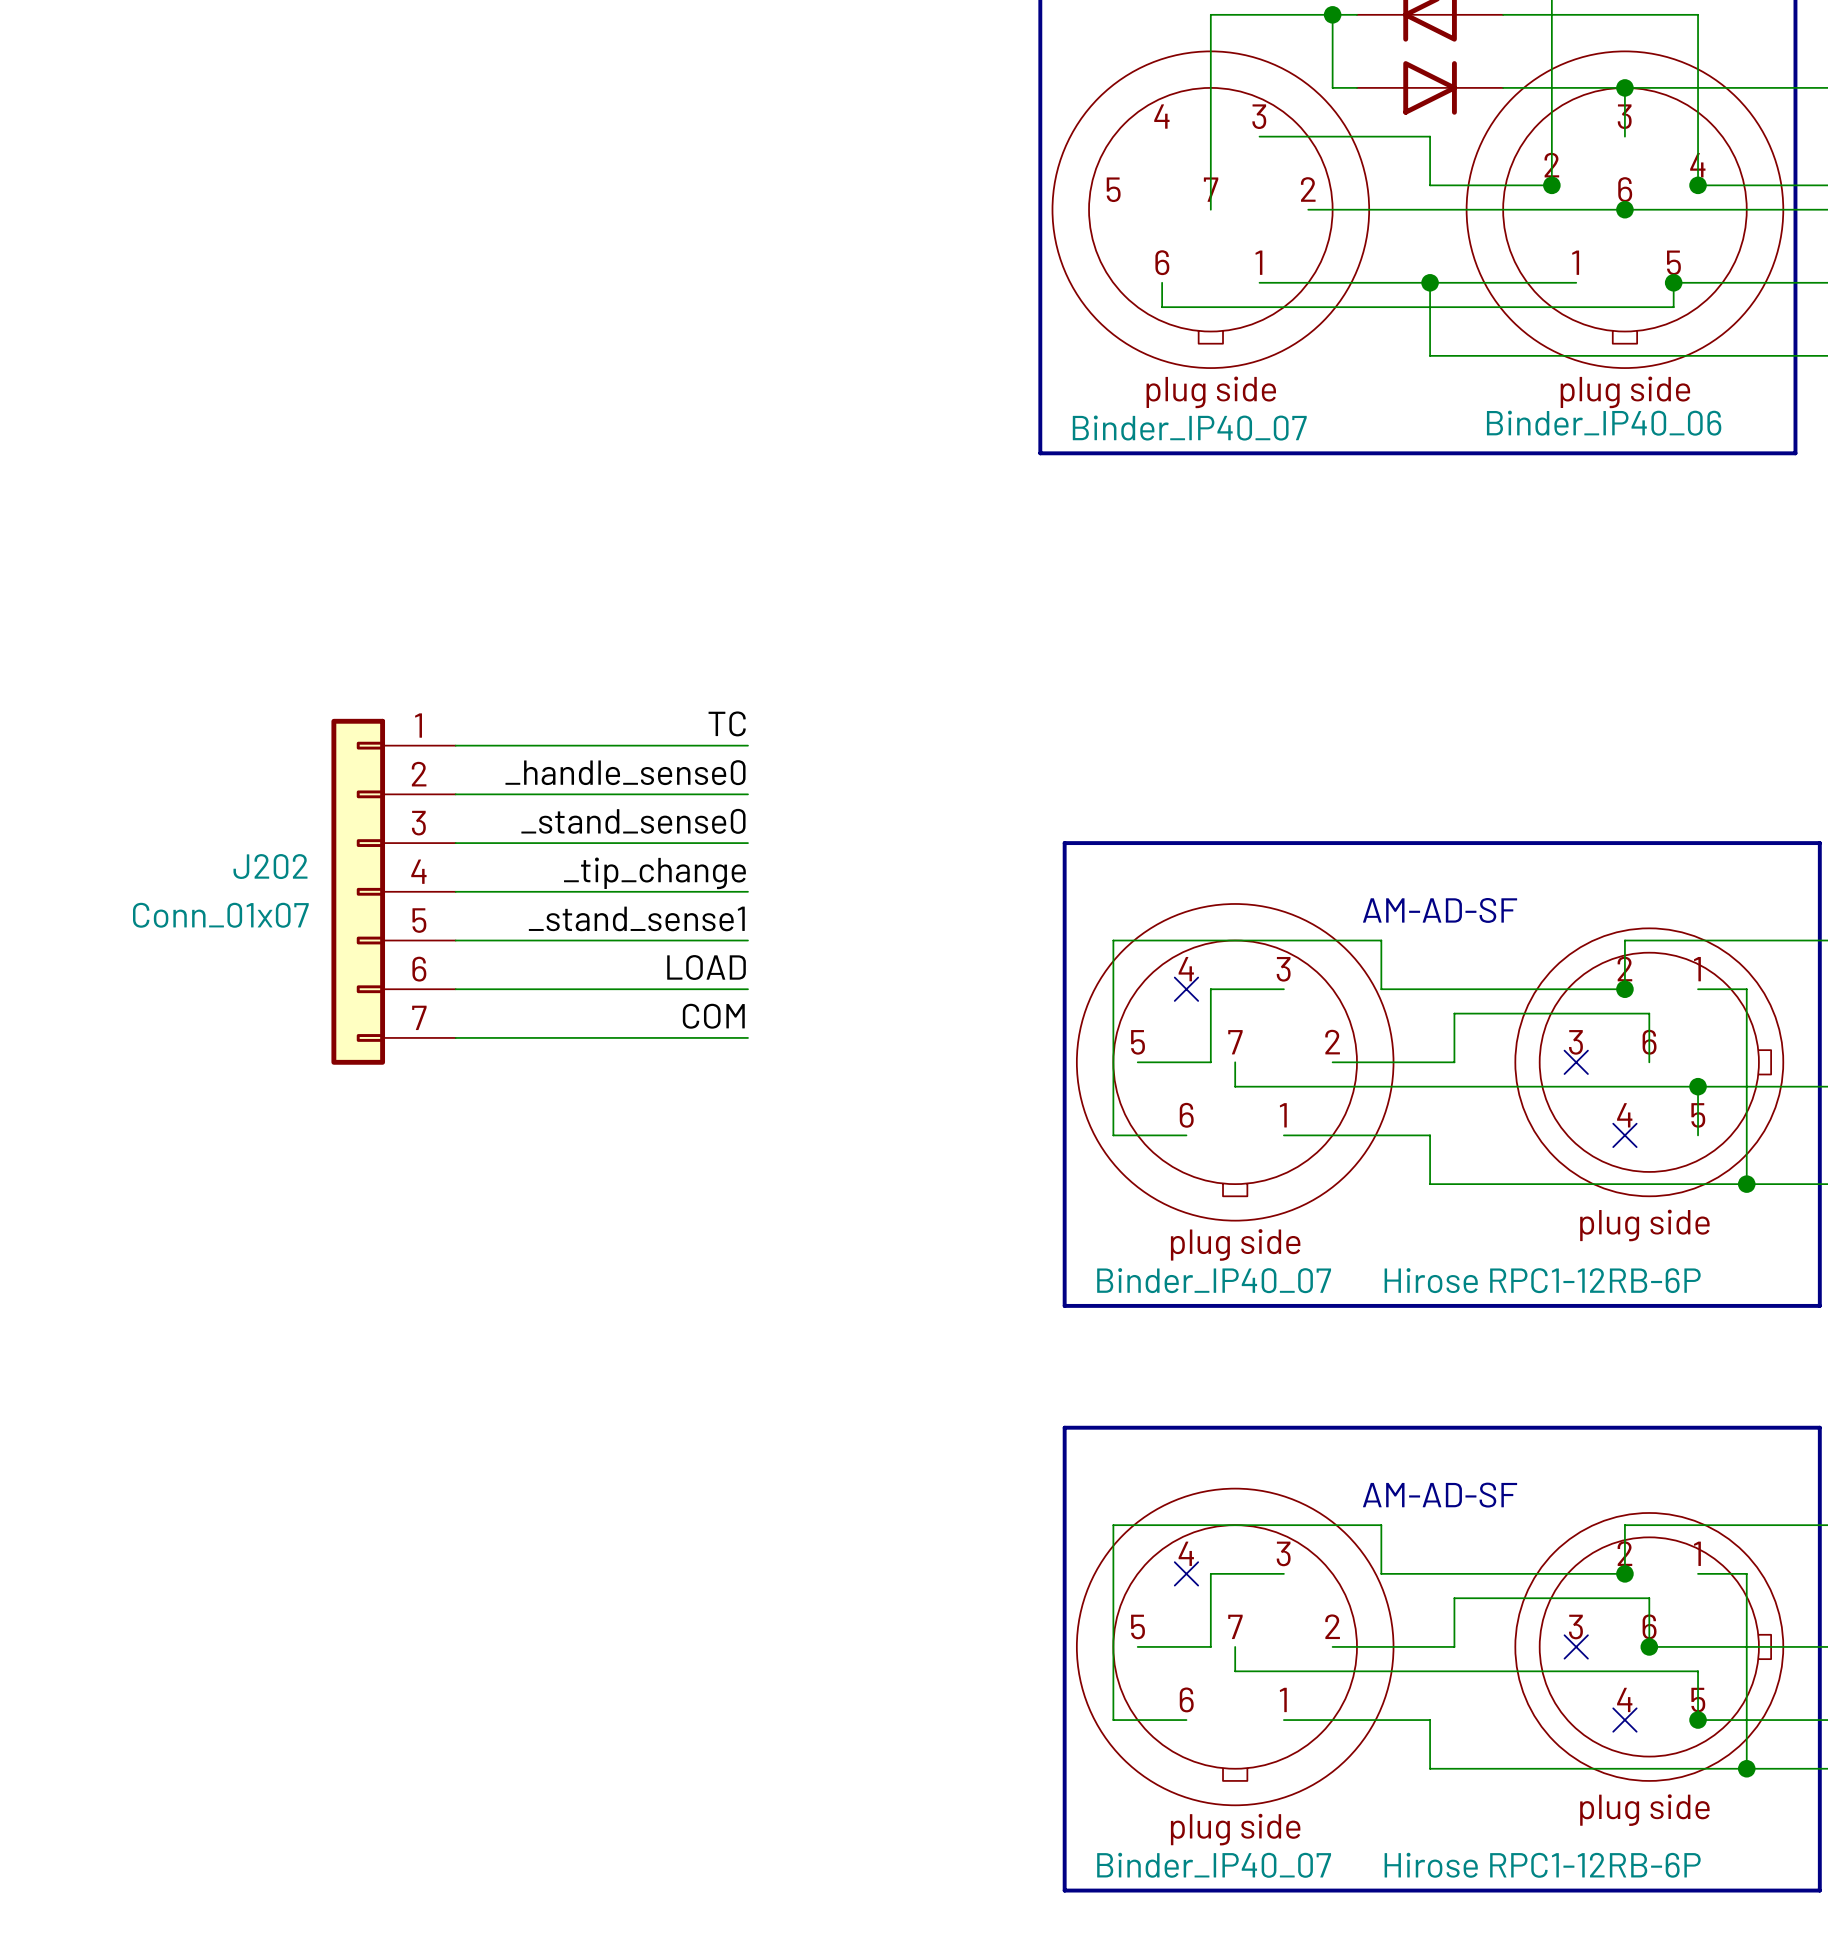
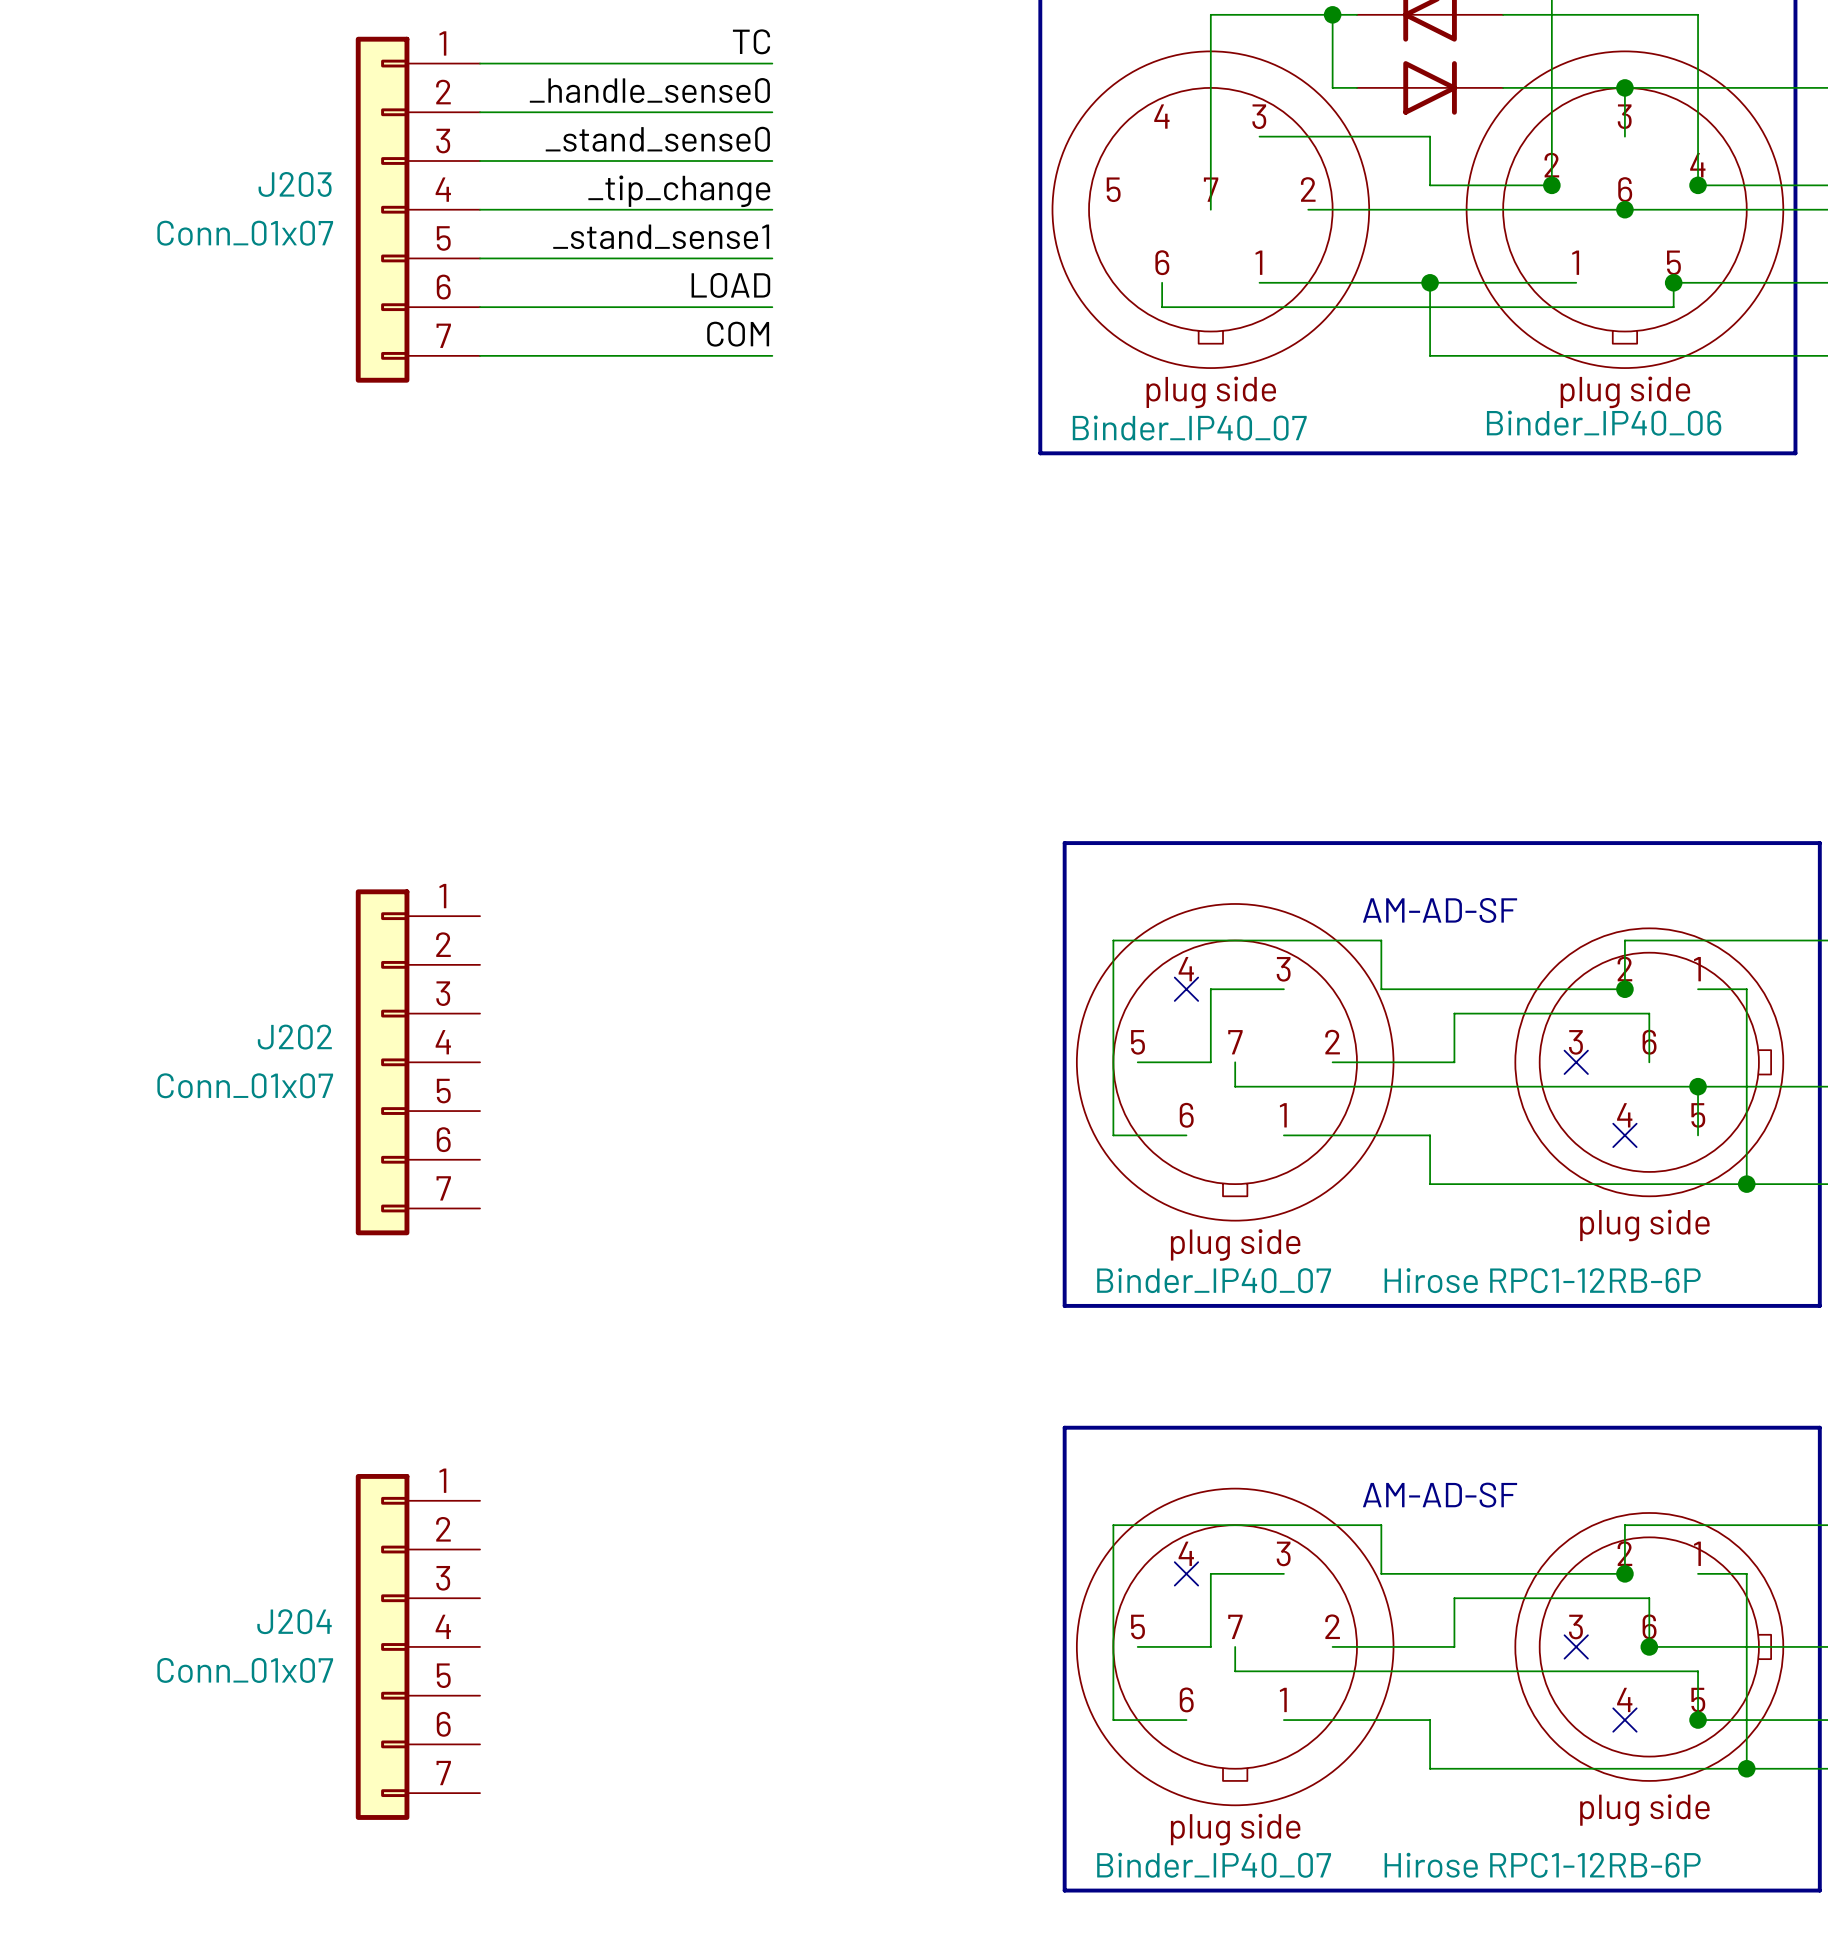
label: none -> TC (751, 41)
wire: none -> (480, 63) (772, 63)
label: none -> _handle_sense0 (649, 90)
wire: none -> (480, 112) (772, 112)
label: none -> _stand_sense0 (657, 139)
wire: none -> (480, 161) (772, 161)
label: none -> _tip_change (679, 191)
J203: none -> Conn_01x07 (417, 209)
wire: none -> (480, 209) (772, 209)
label: none -> _stand_sense1 (661, 236)
wire: none -> (480, 258) (772, 258)
label: none -> LOAD (730, 285)
label: none -> COM (738, 334)
label: TC (727, 723) -> none
wire: (455, 745) (747, 745) -> (480, 307) (772, 307)
label: _handle_sense0 (625, 772) -> none
wire: (455, 794) (747, 794) -> (480, 355) (772, 355)
label: _stand_sense0 (633, 821) -> none
wire: (455, 843) (747, 843) -> none
label: _tip_change (654, 873) -> none
J202 position: (393, 891) -> (417, 1062)
wire: (455, 891) (747, 891) -> none
label: _stand_sense1 (636, 918) -> none
wire: (455, 940) (747, 940) -> none
label: LOAD (706, 967) -> none
wire: (455, 989) (747, 989) -> none
label: COM (713, 1016) -> none
wire: (455, 1037) (747, 1037) -> none
J204: none -> Conn_01x07 (417, 1646)

